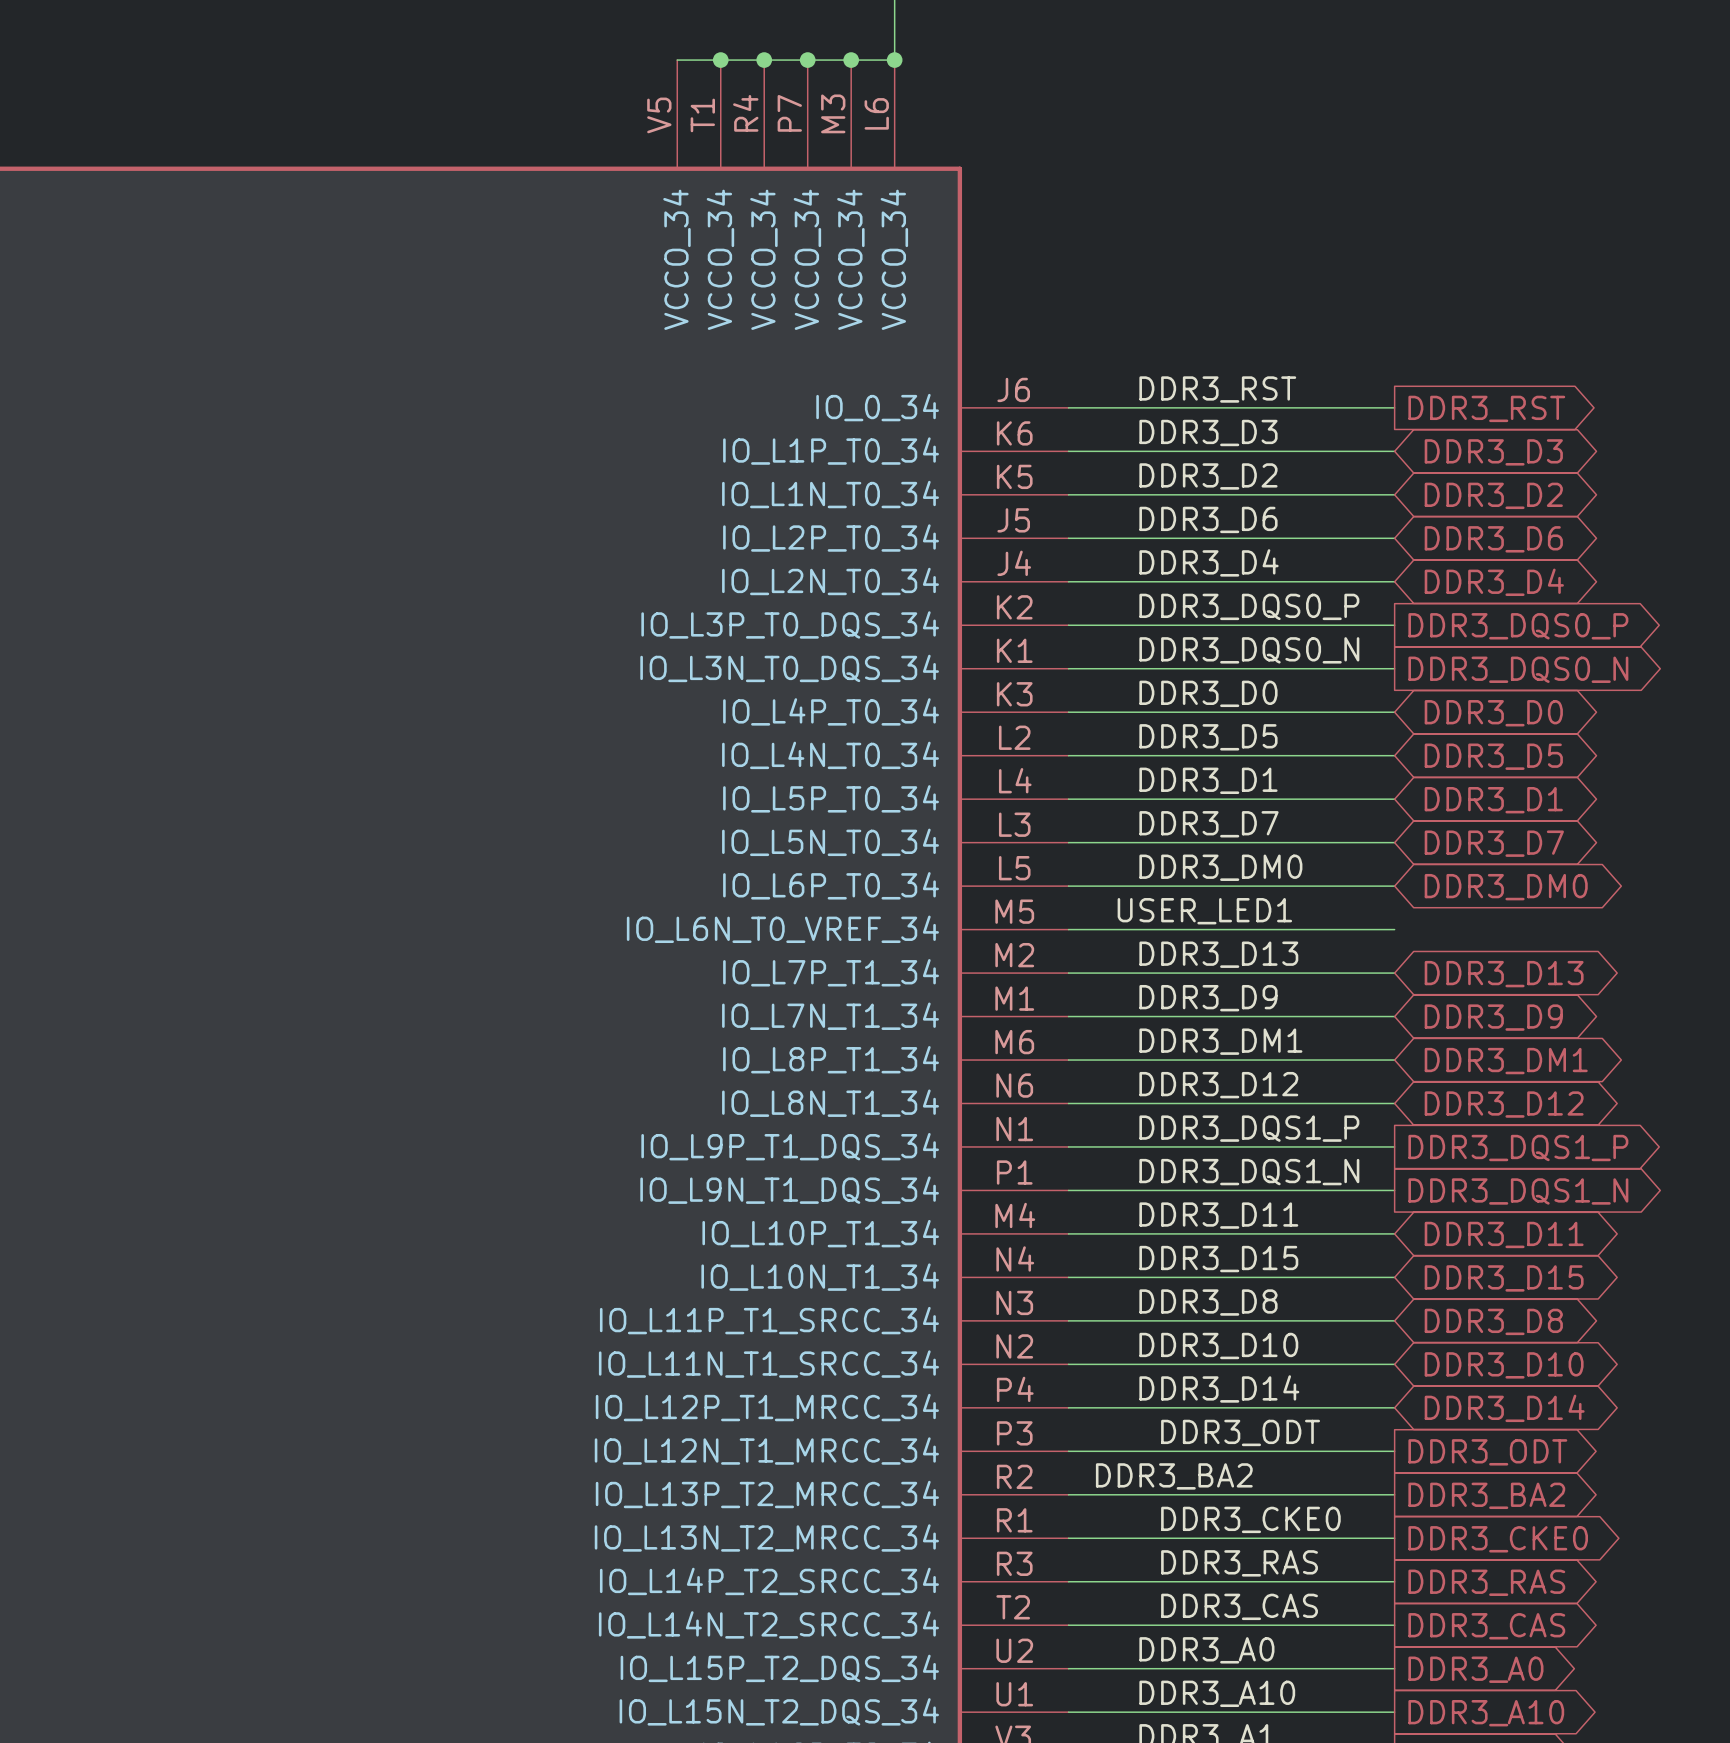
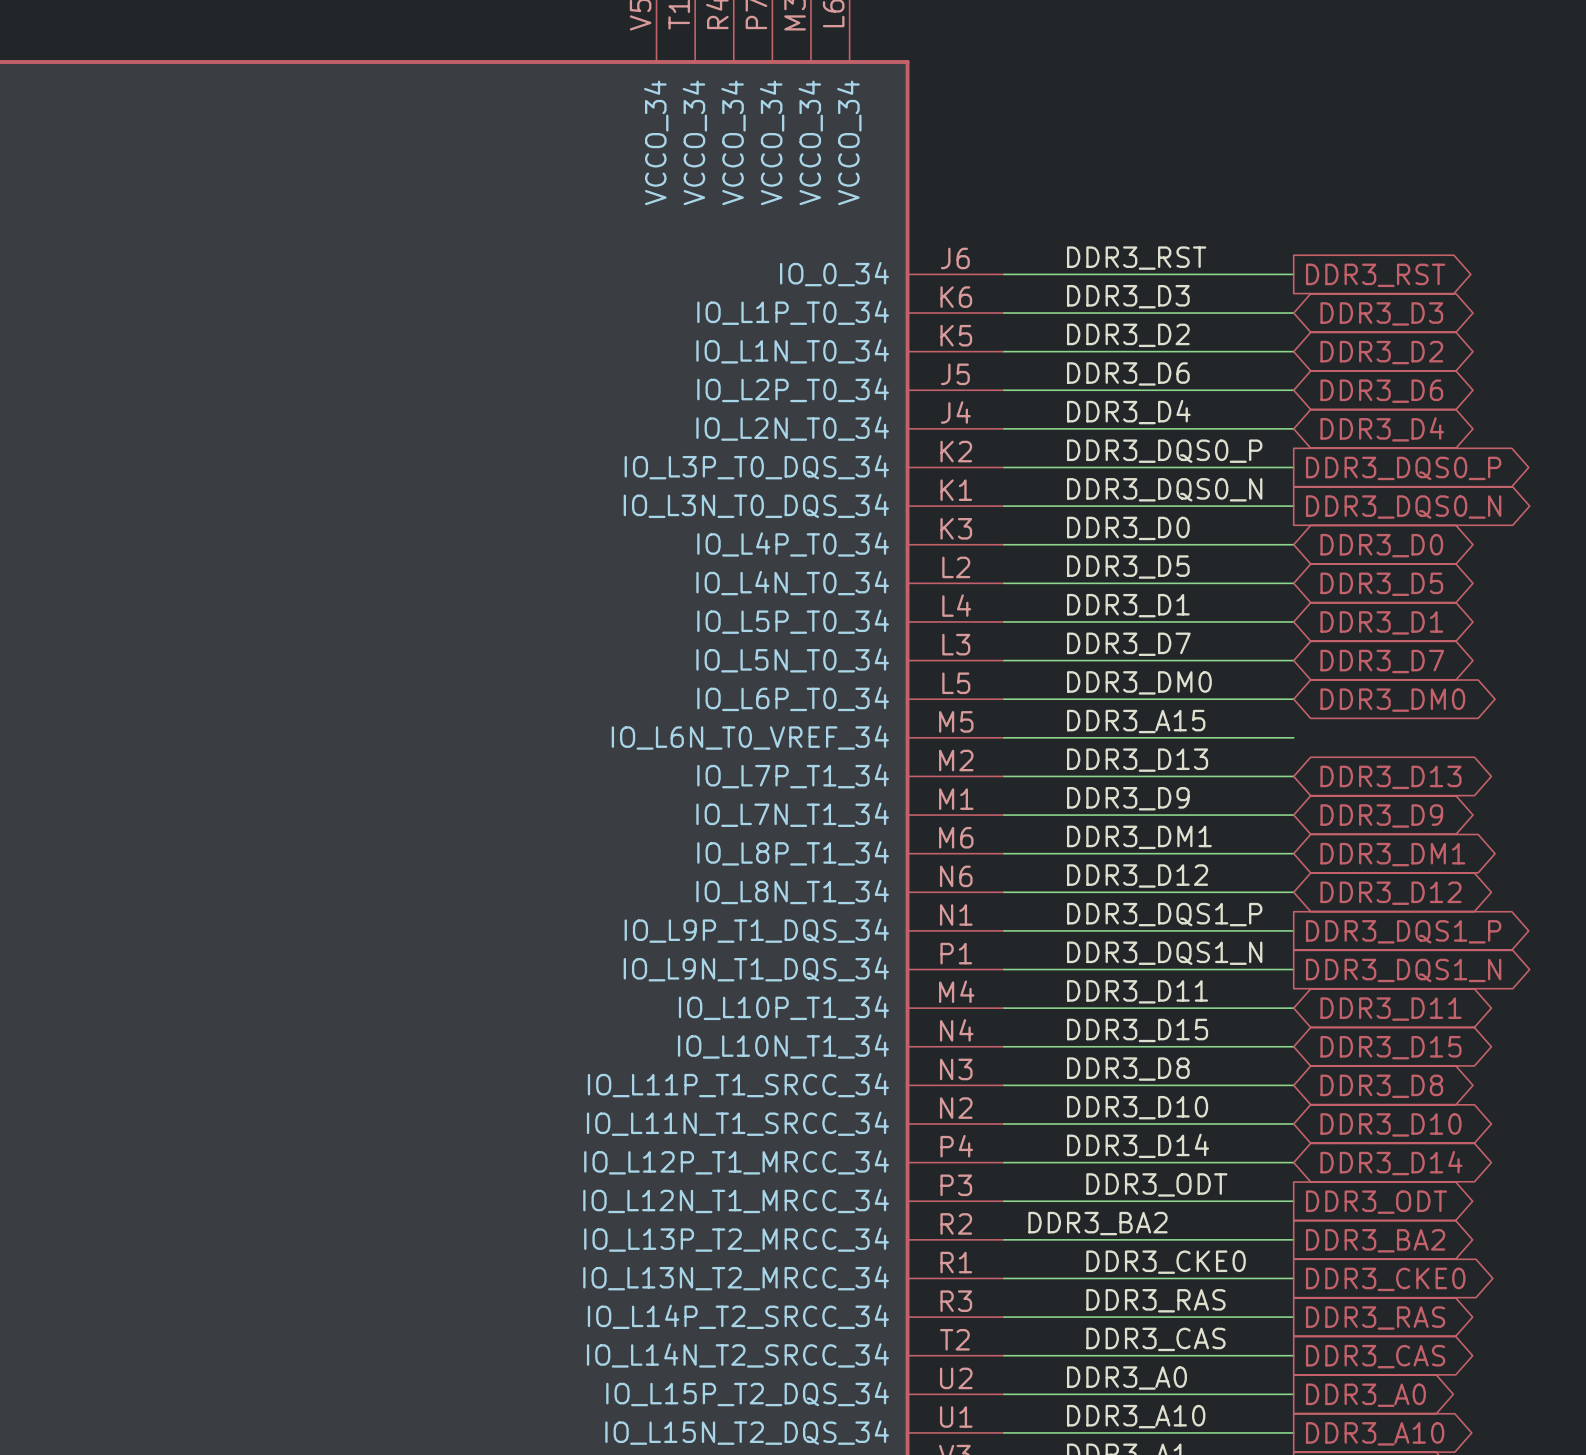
label: USER_LED1 (1204, 911) -> none
label: none -> DDR3_A15 (1136, 721)

